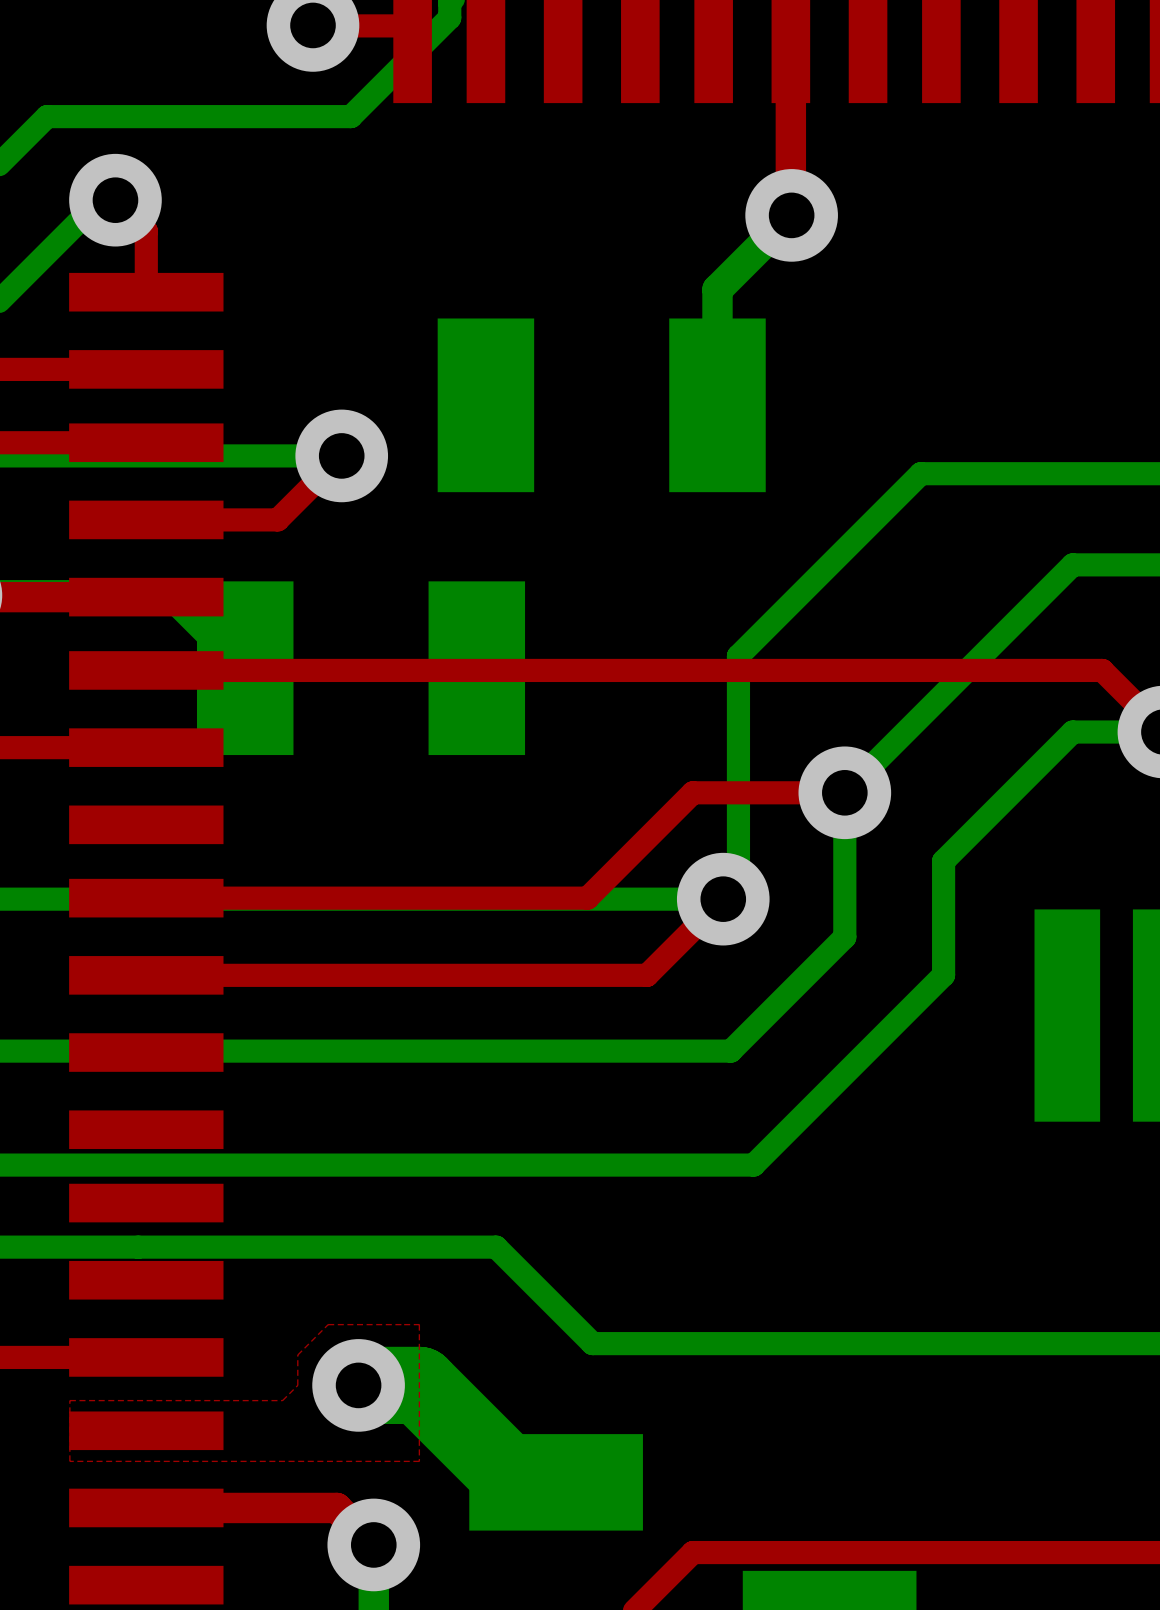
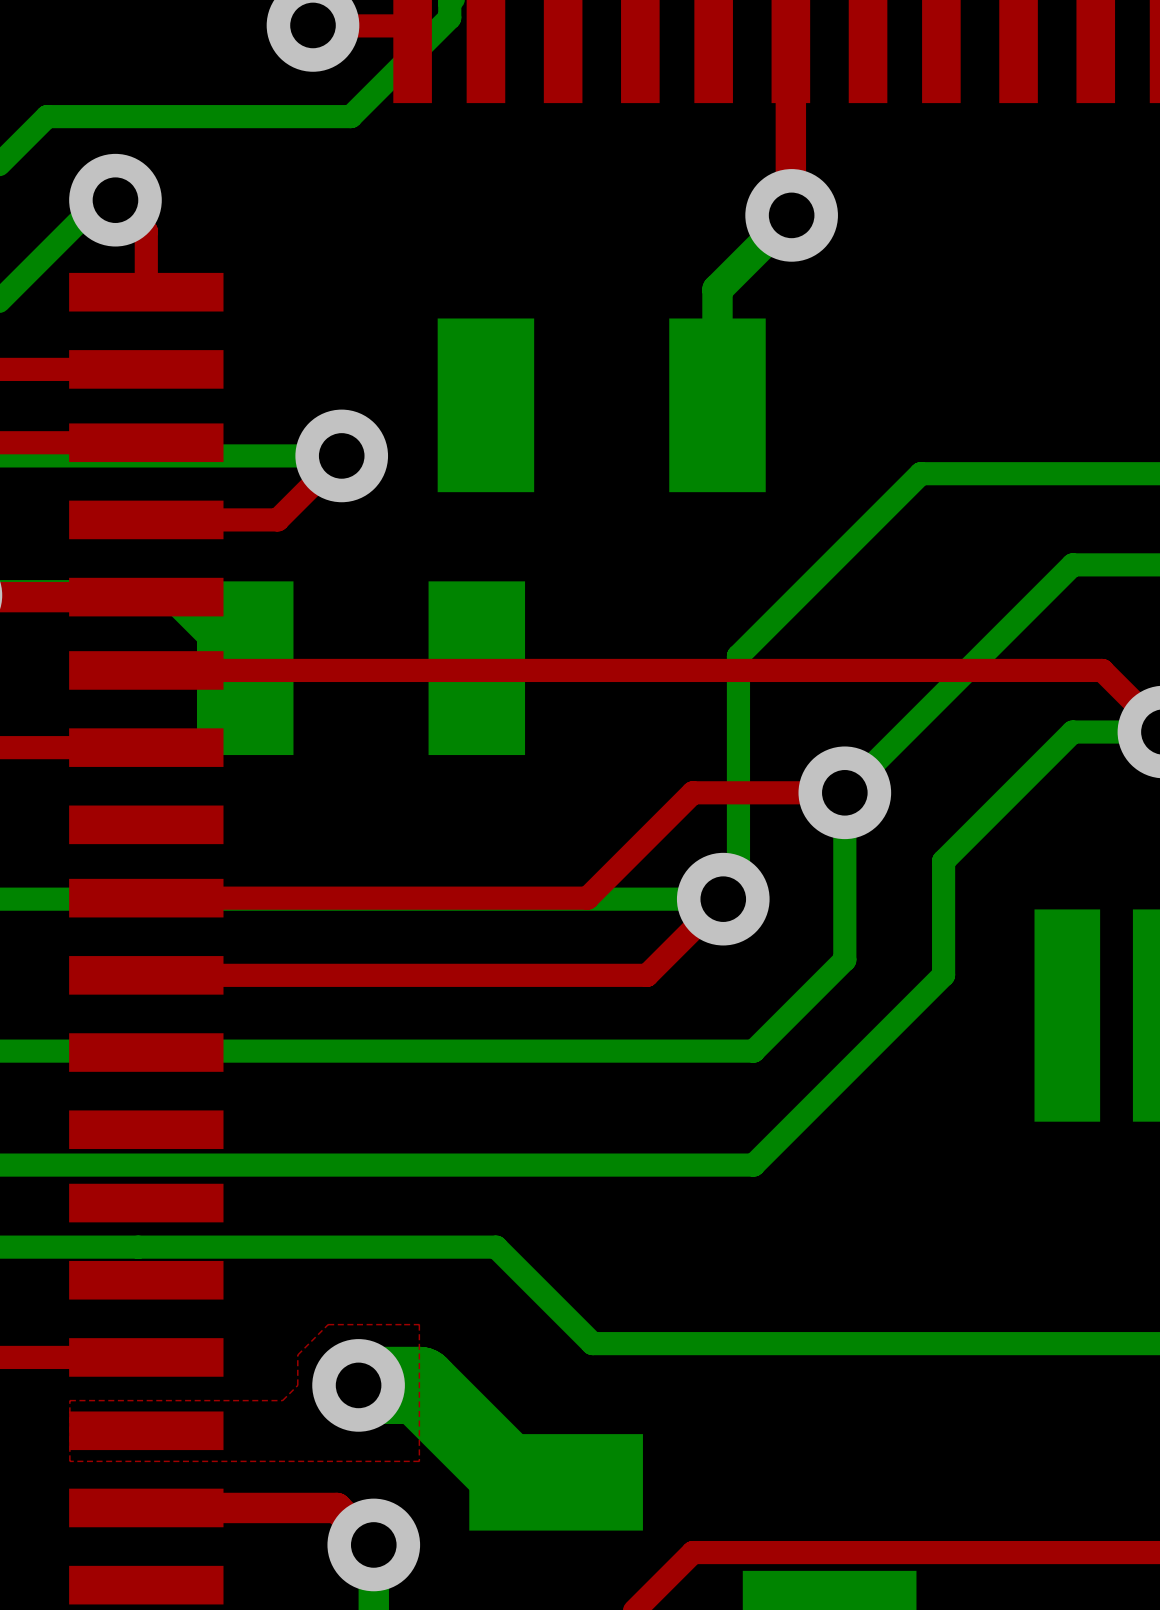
bottom track: (844, 937) (730, 1051) -> (844, 937) (844, 959) (753, 1051) (730, 1051)

